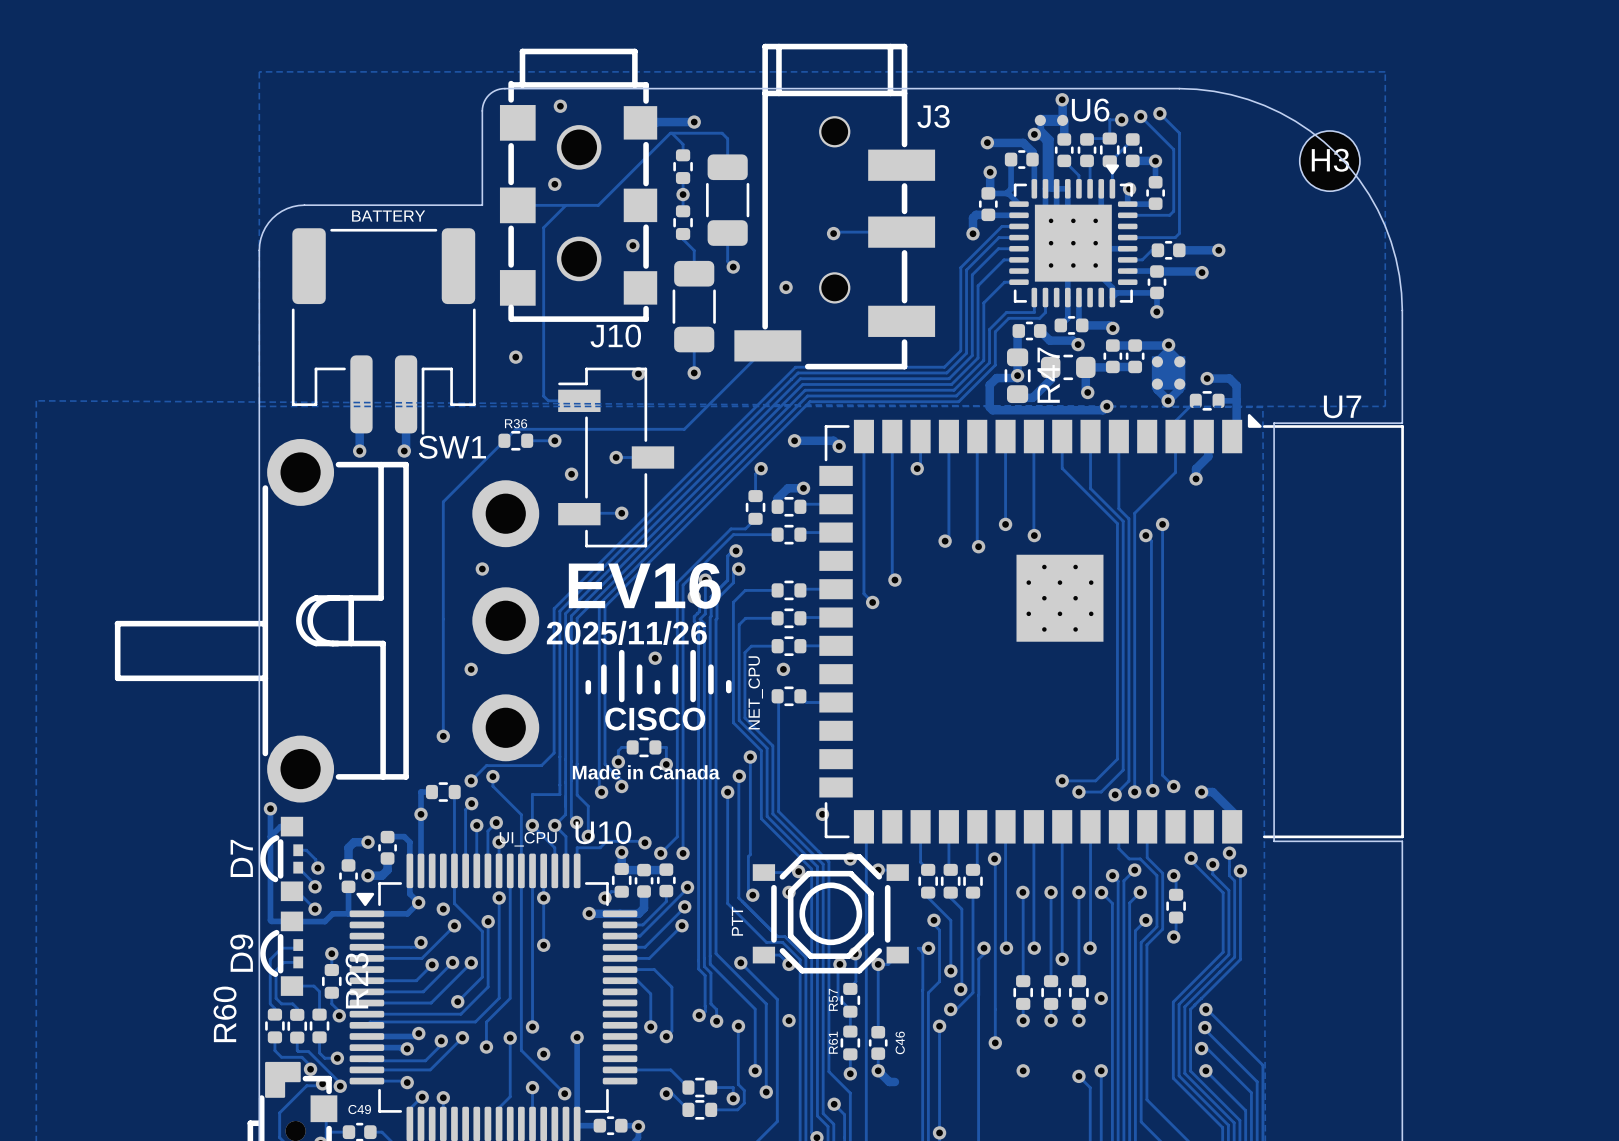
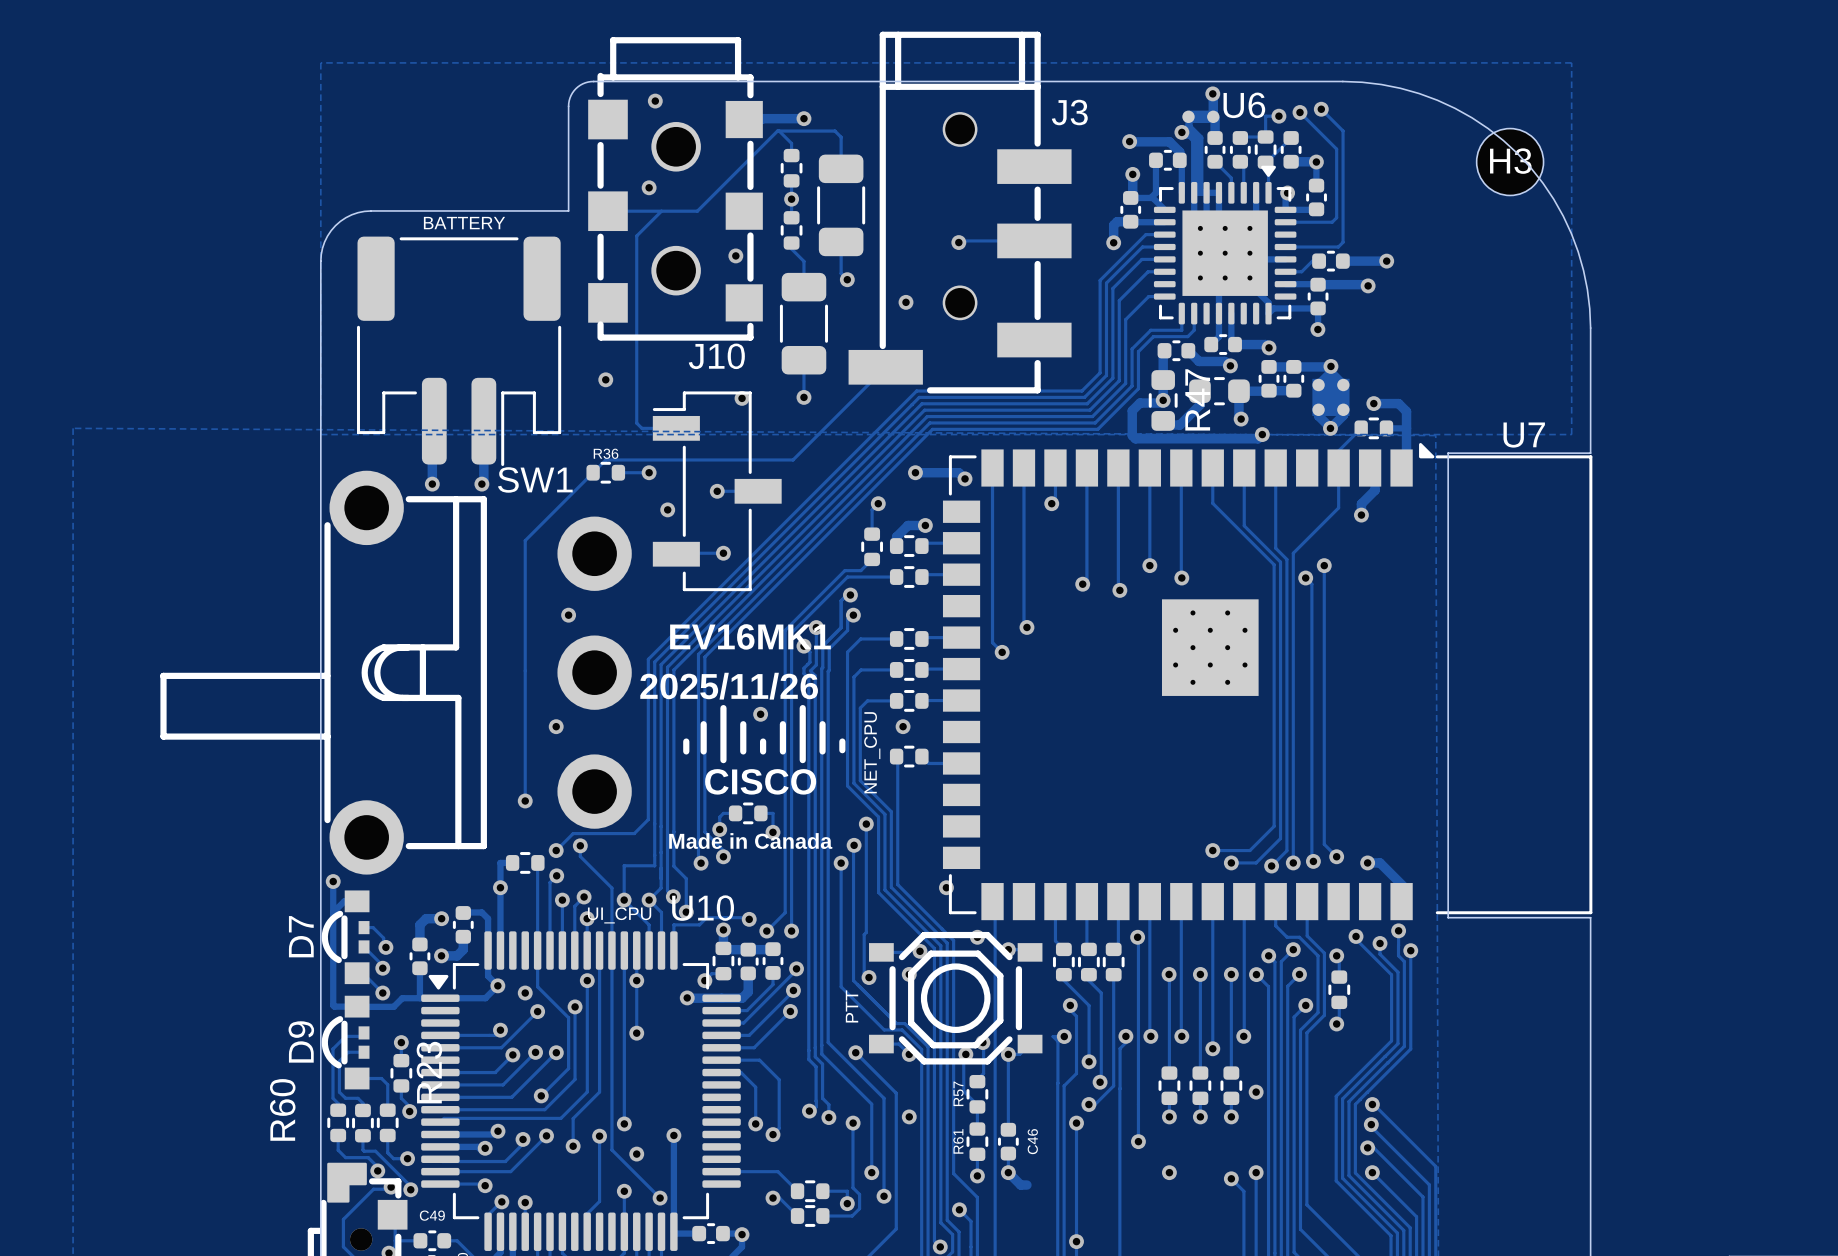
text: EV16 (644, 585) -> EV16MK1 (750, 636)

